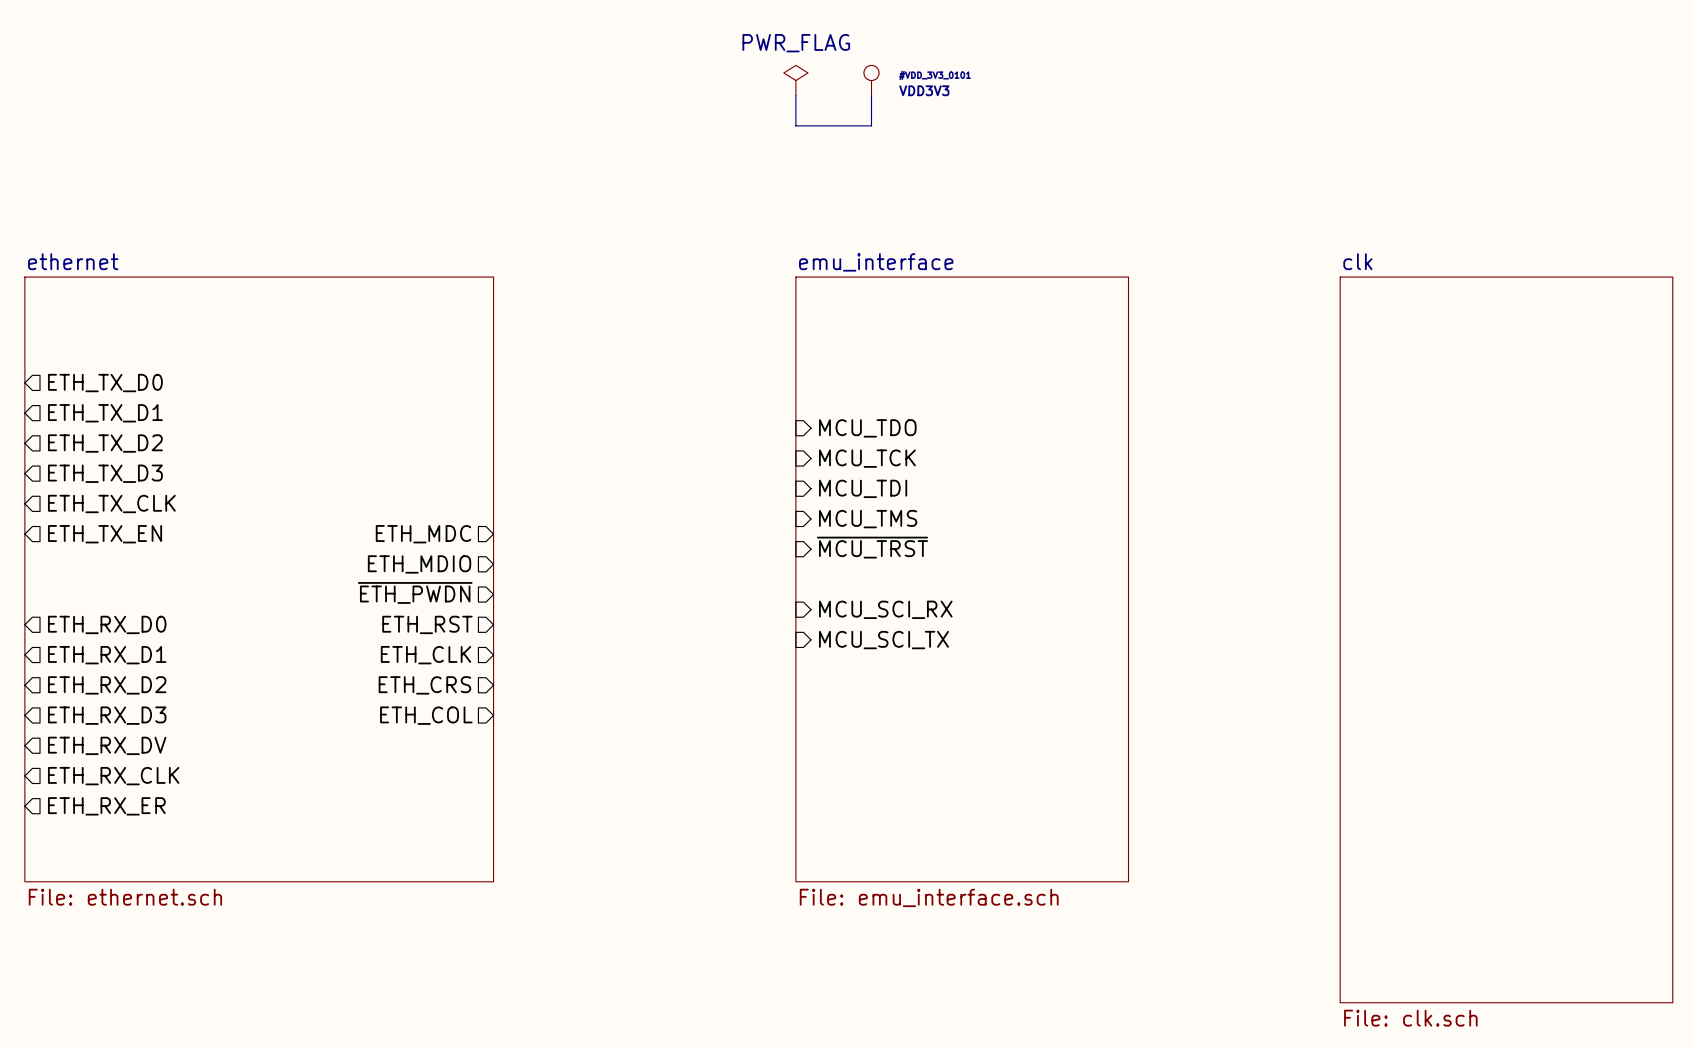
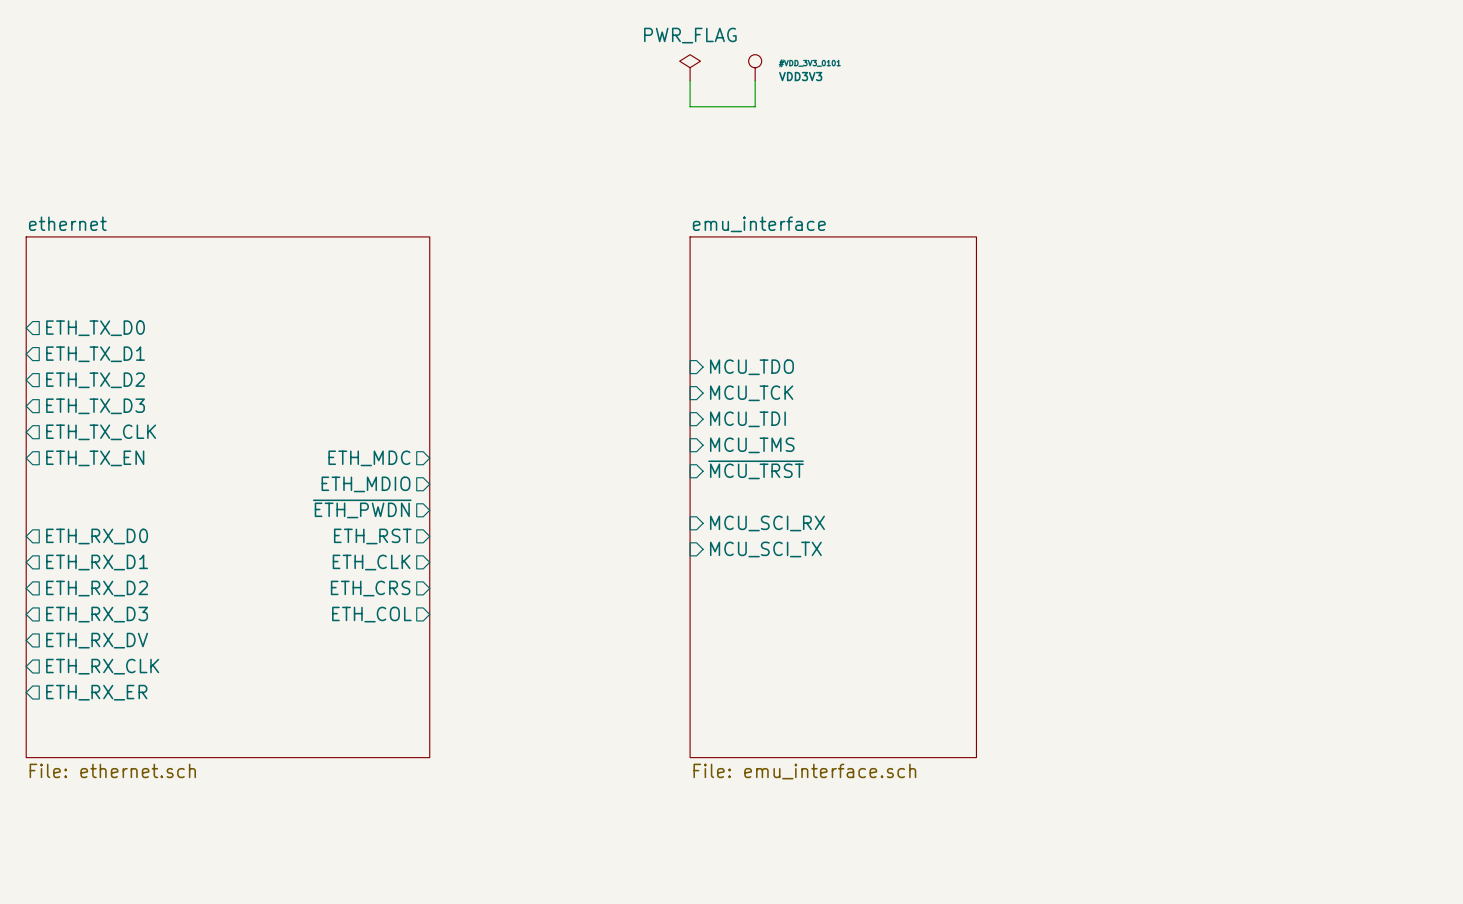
sheet clk: File: clk.sch (1506, 639) -> none

